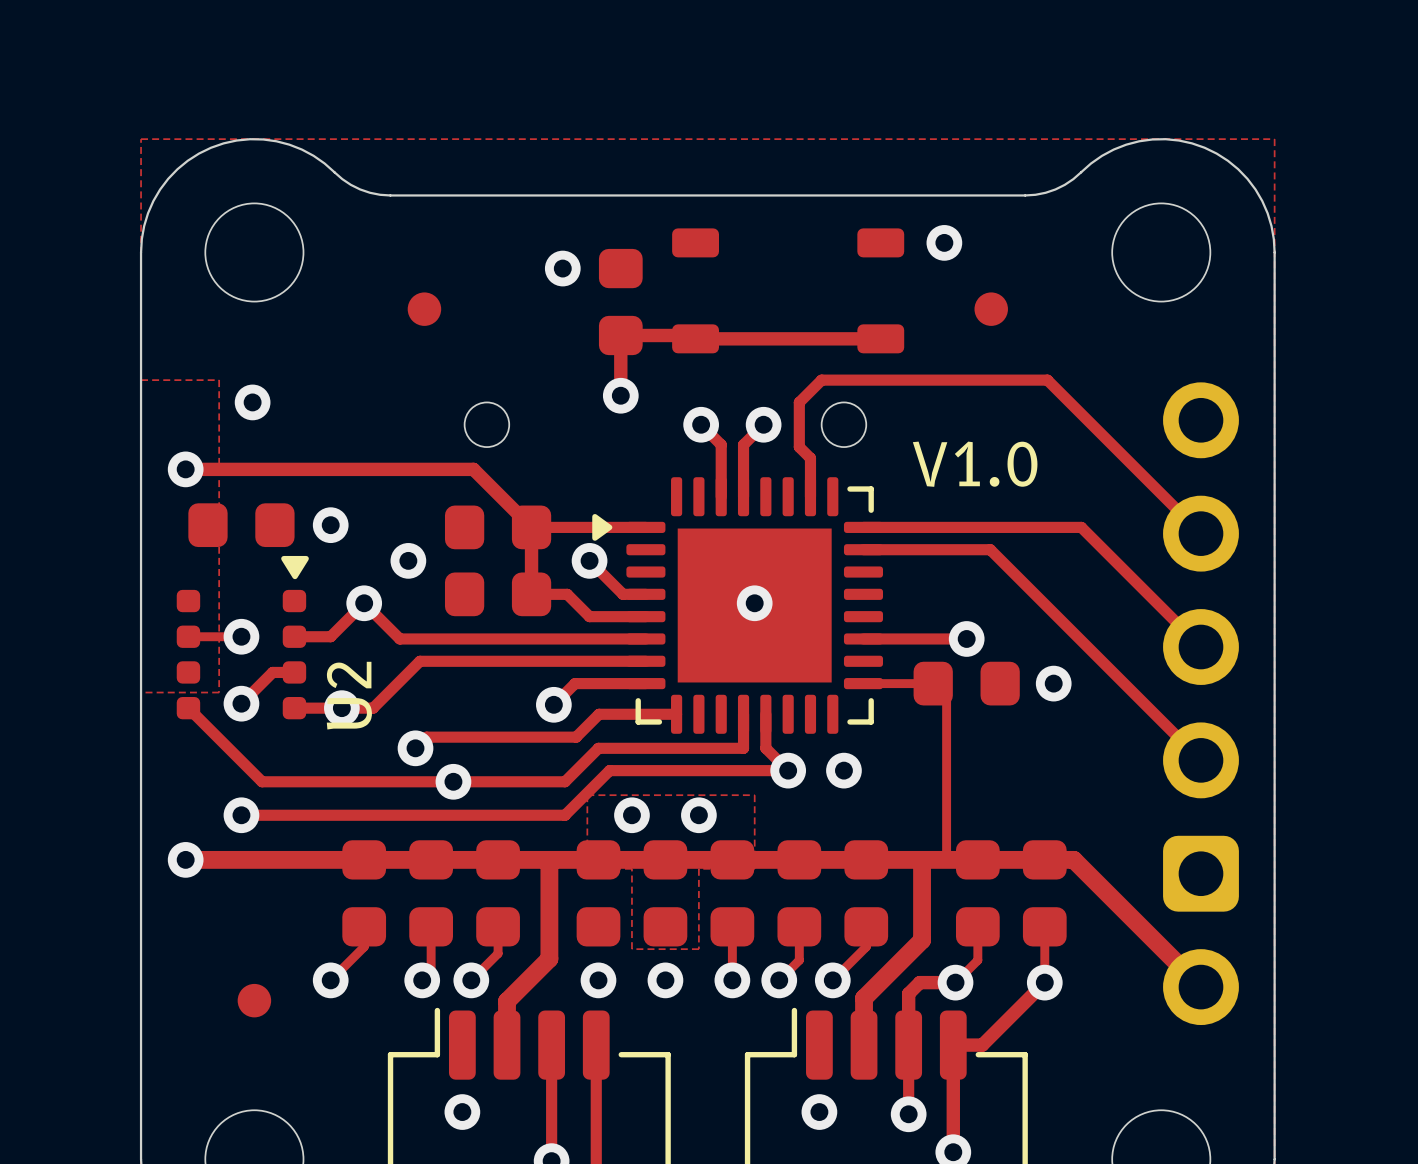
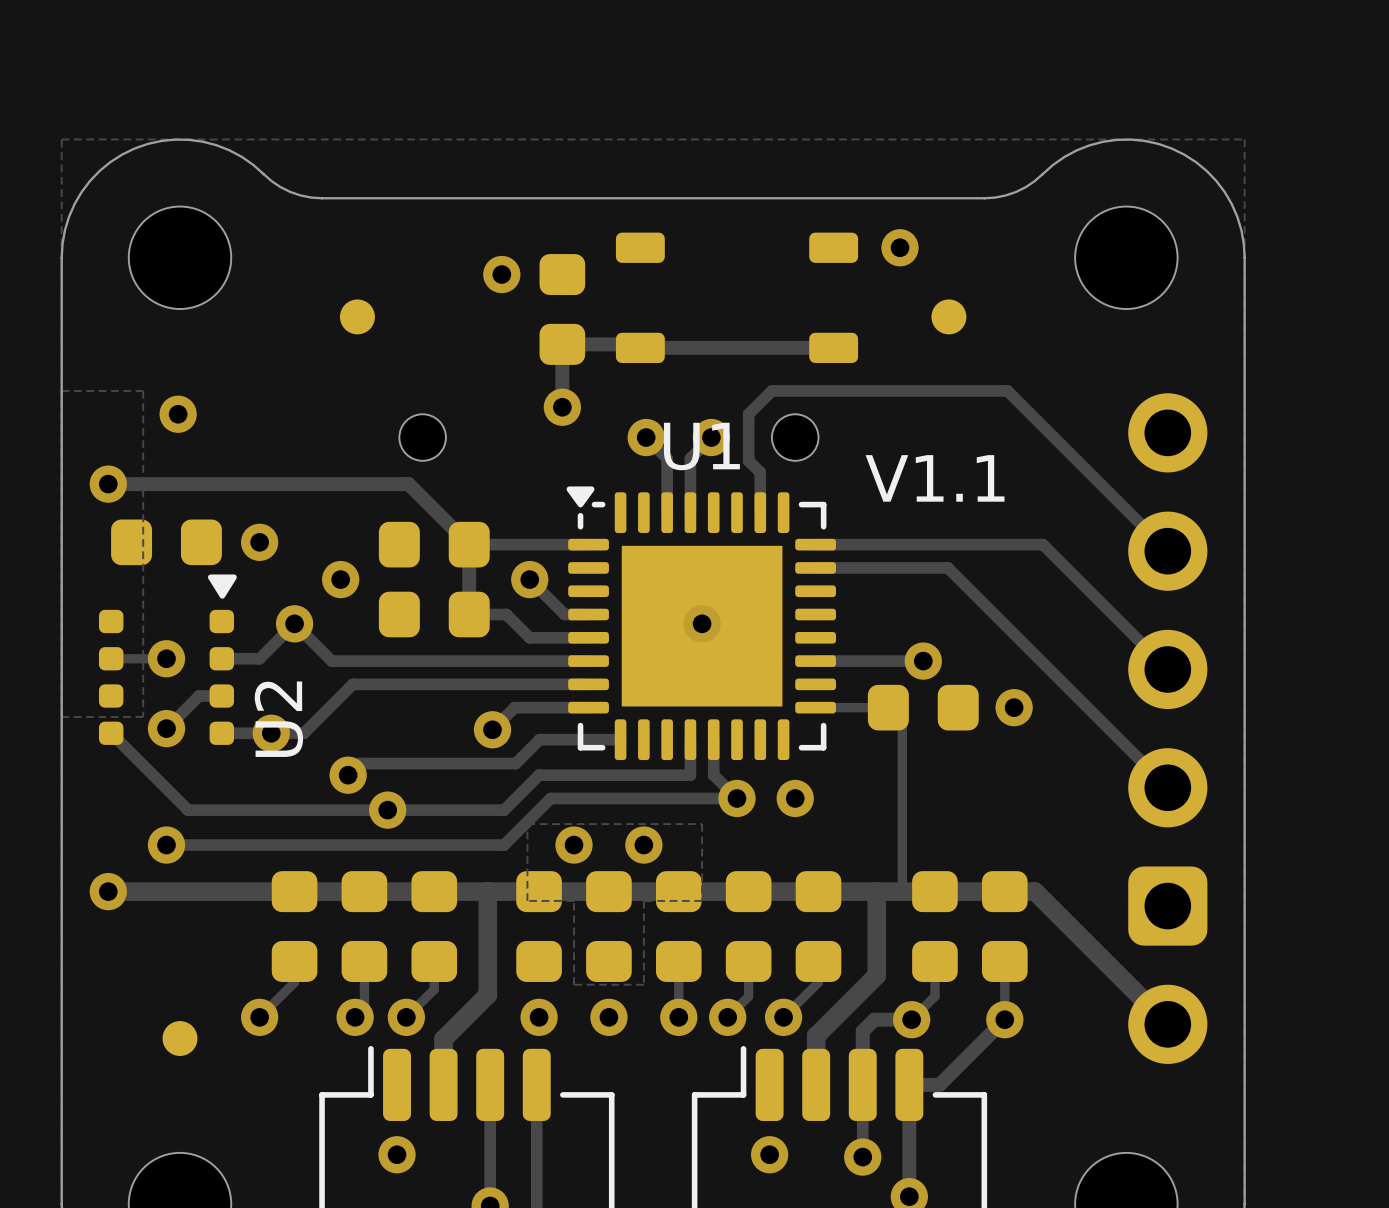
text: V1.0 (975, 464) -> V1.1 (935, 478)
U1: none -> (701, 623)
part: (737, 605) -> none

